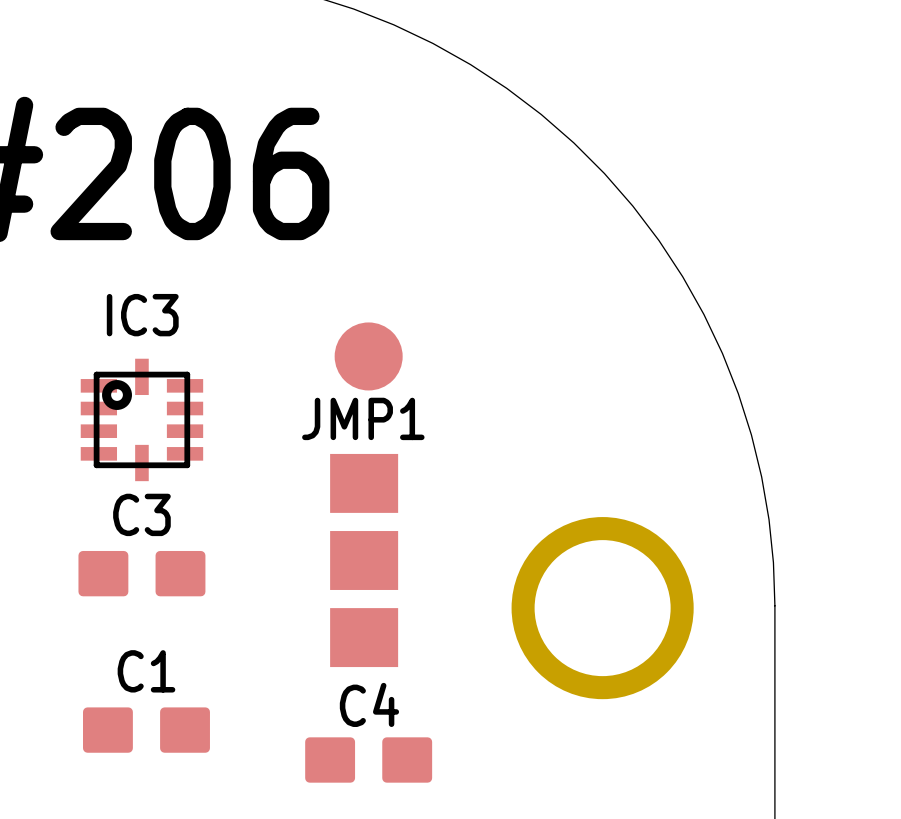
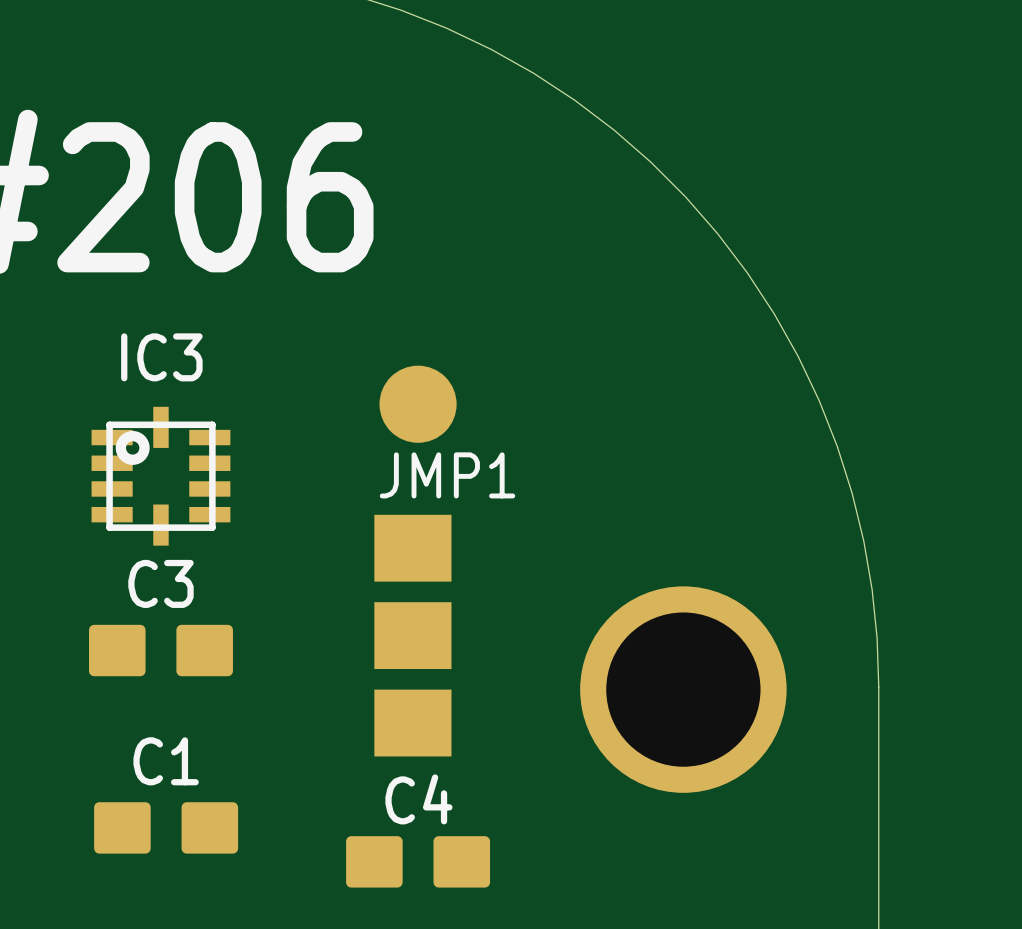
JMP1 name position: JMP1 (363, 418) -> JMP1 (447, 475)

